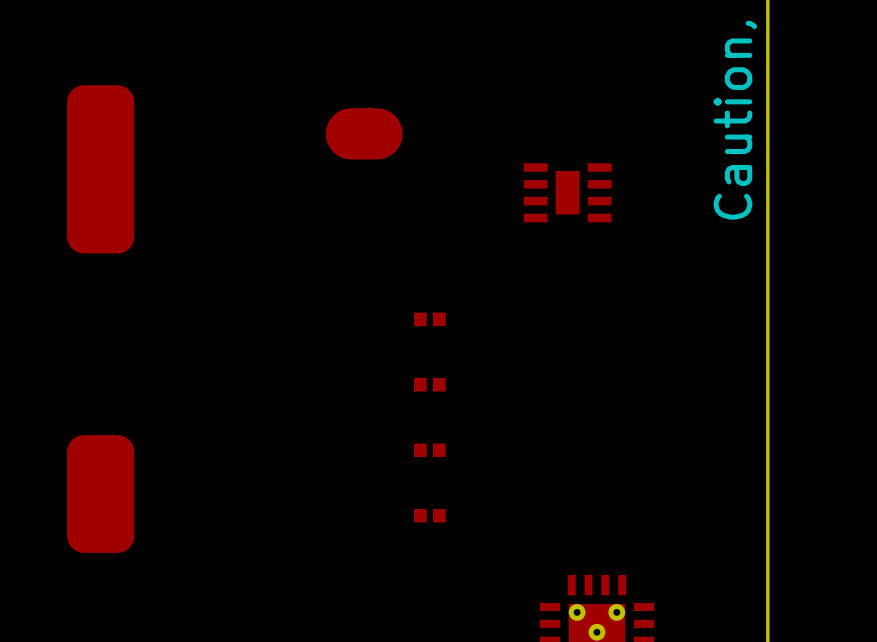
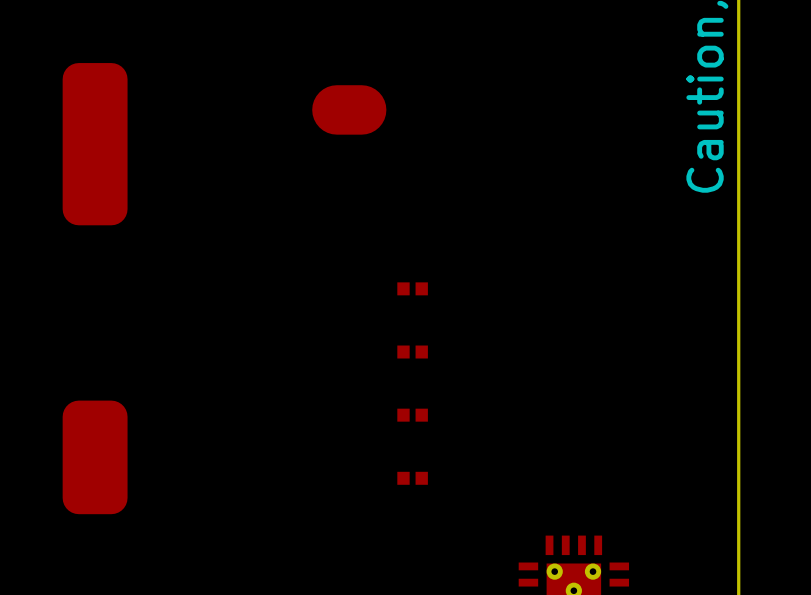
part: (567, 192) -> none

